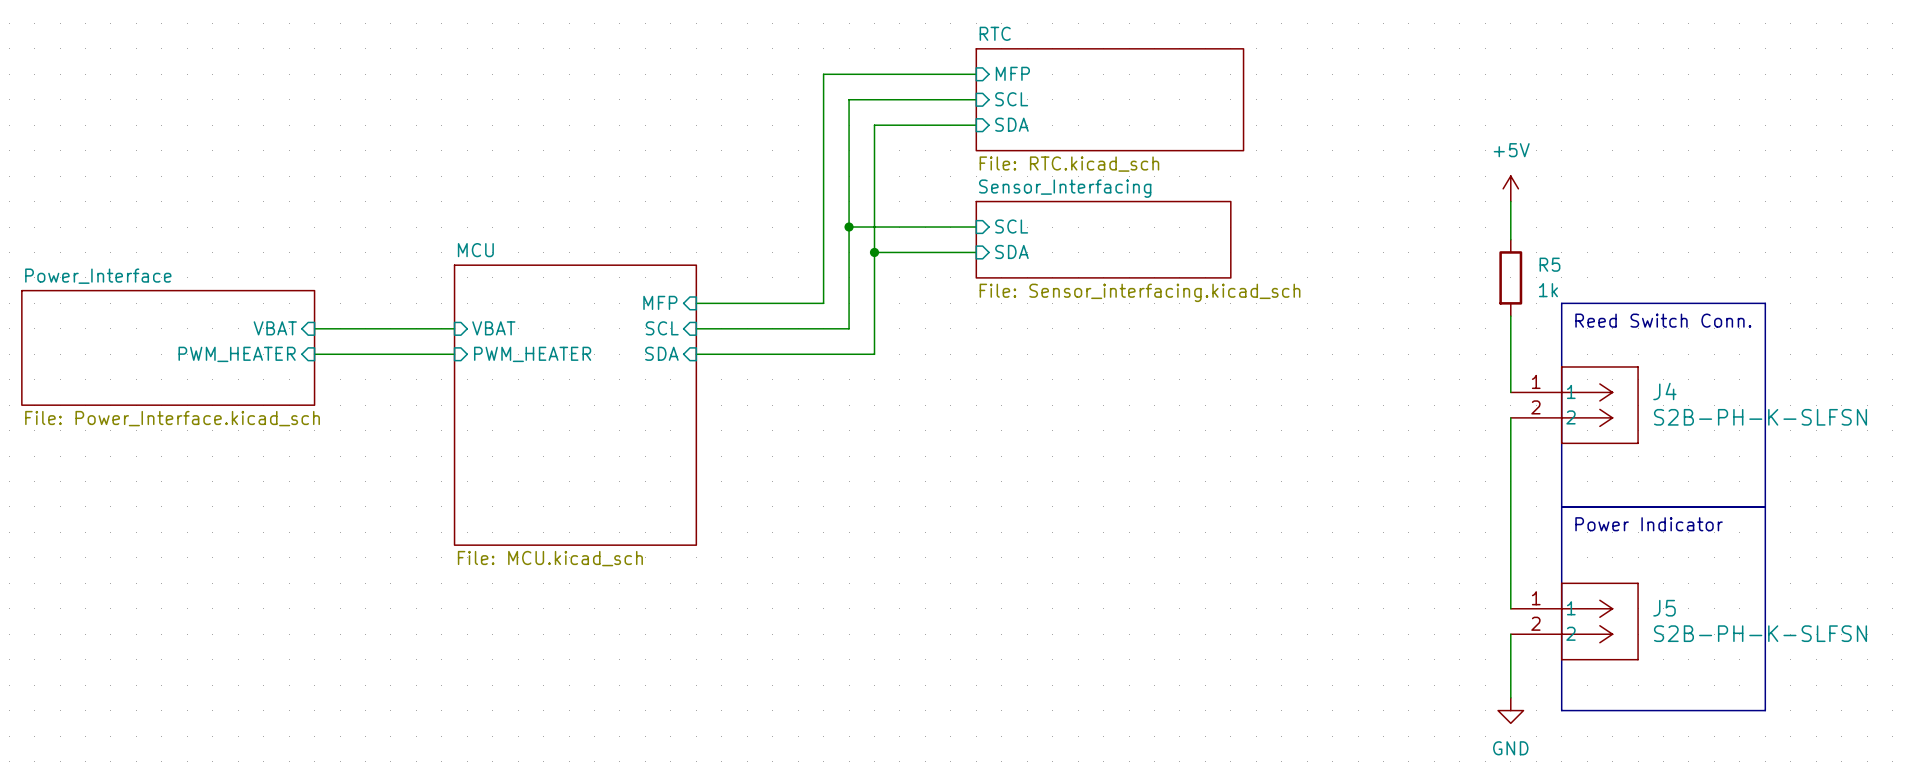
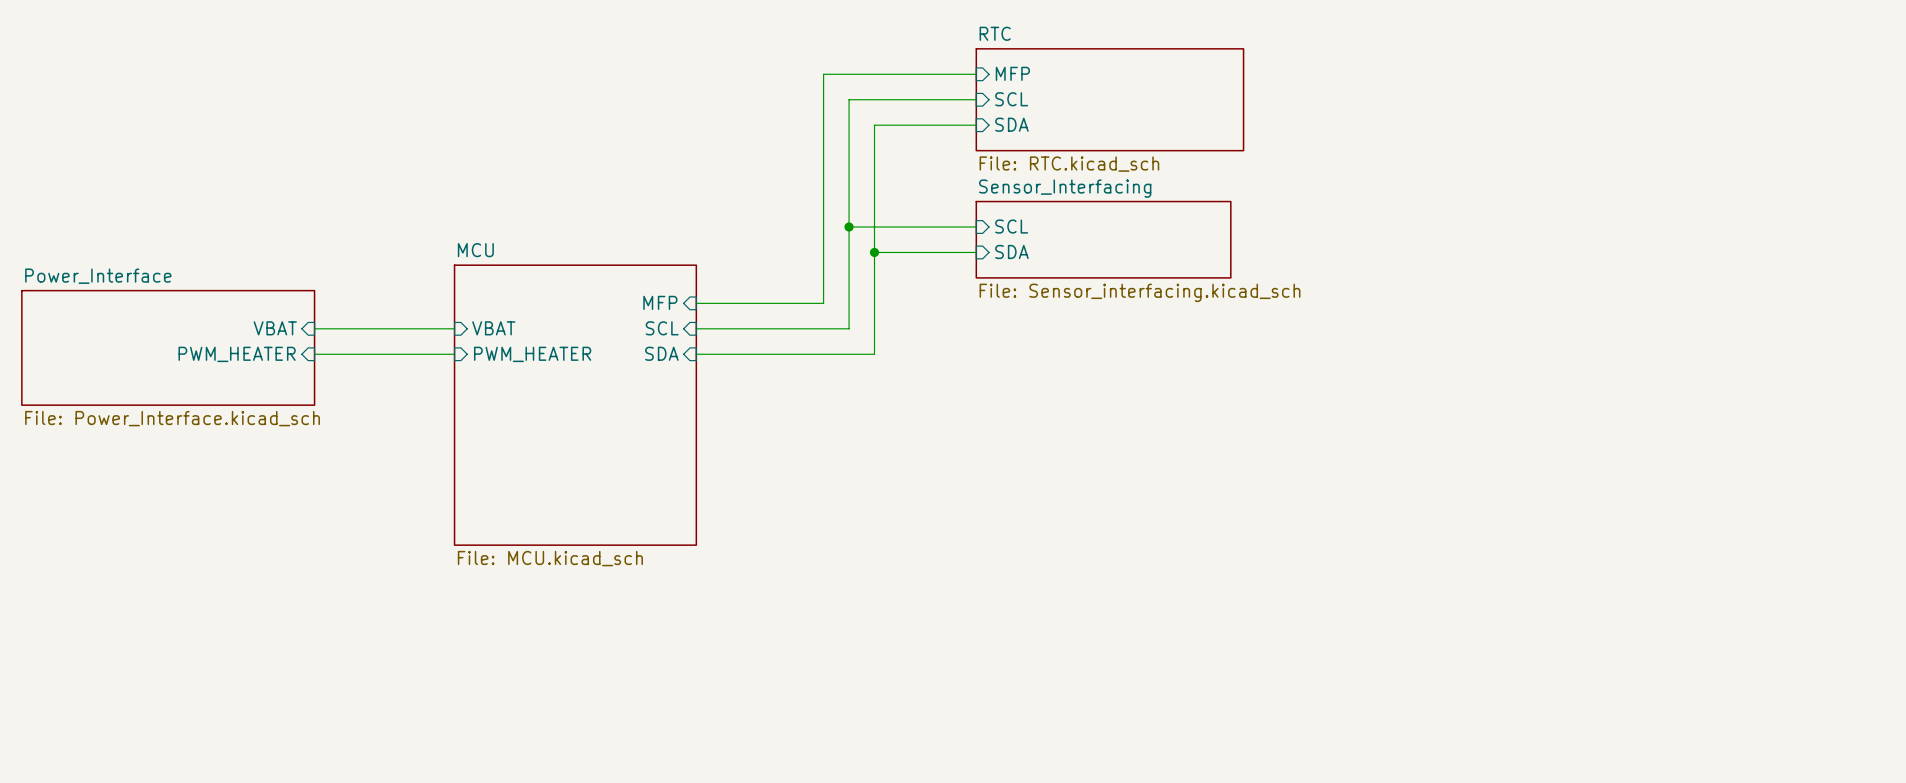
power symbol: +5V (1510, 188) -> none
wire: (1510, 201) (1510, 239) -> none
R5: 1k (1510, 277) -> none
line: (1561, 303) (1561, 710) (1765, 710) (1765, 303) (1561, 303) -> none
wire: (1510, 316) (1510, 392) -> none
text: Reed Switch Conn. (1663, 320) -> none
J4: S2B-PH-K-SLFSN (1574, 405) -> none
wire: (1510, 417) (1510, 608) -> none
line: (1561, 506) (1765, 506) -> none
text: Power Indicator (1649, 524) -> none
J5: S2B-PH-K-SLFSN (1574, 621) -> none
wire: (1510, 634) (1510, 697) -> none
power symbol: GND (1510, 710) -> none

